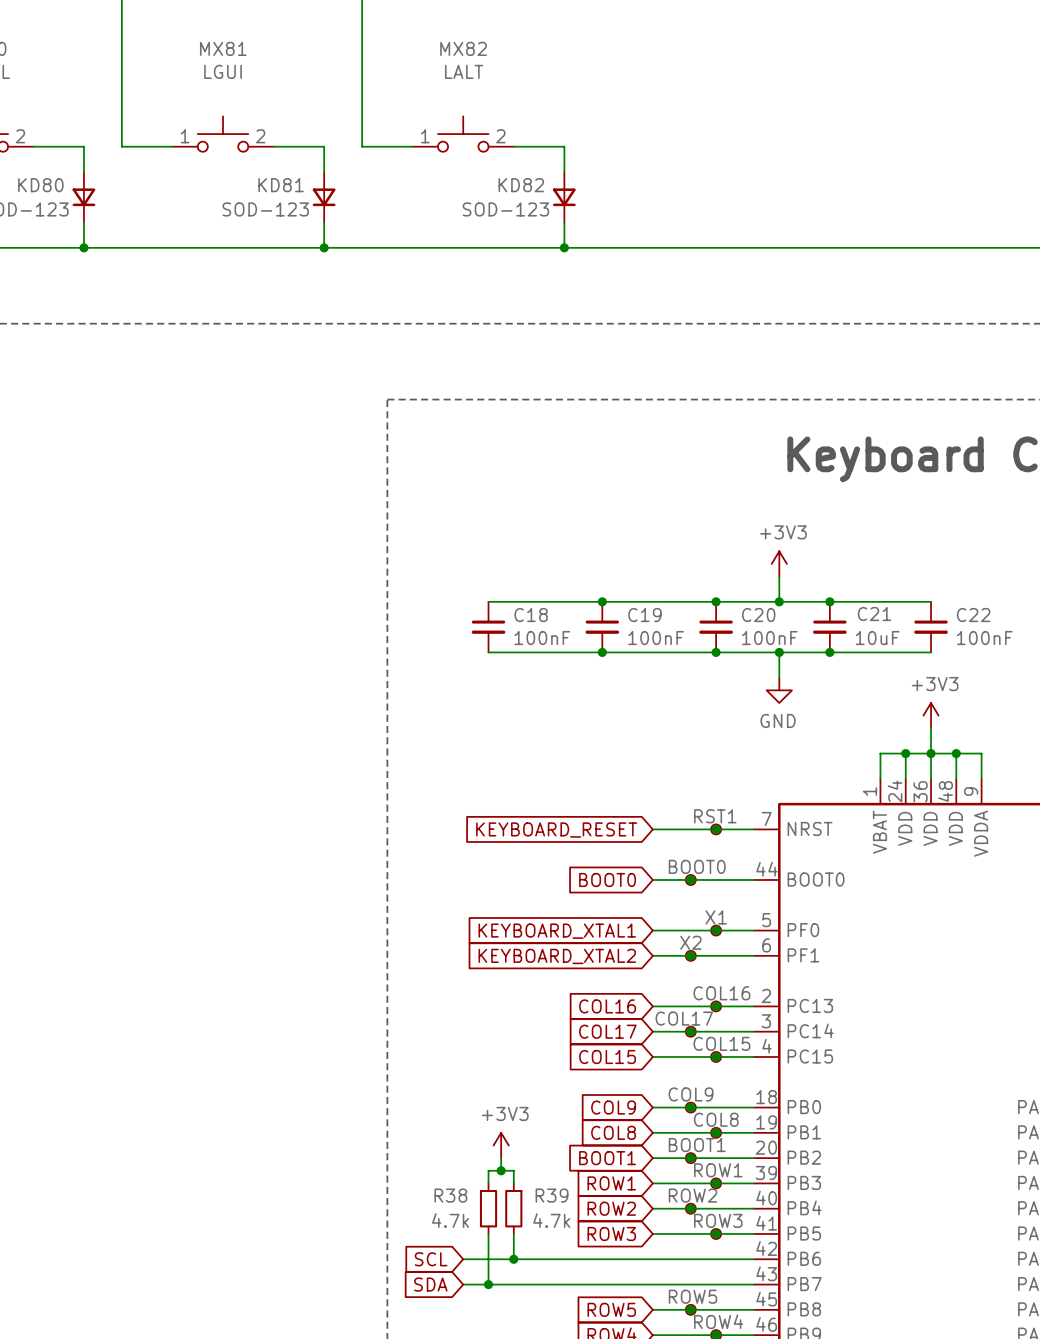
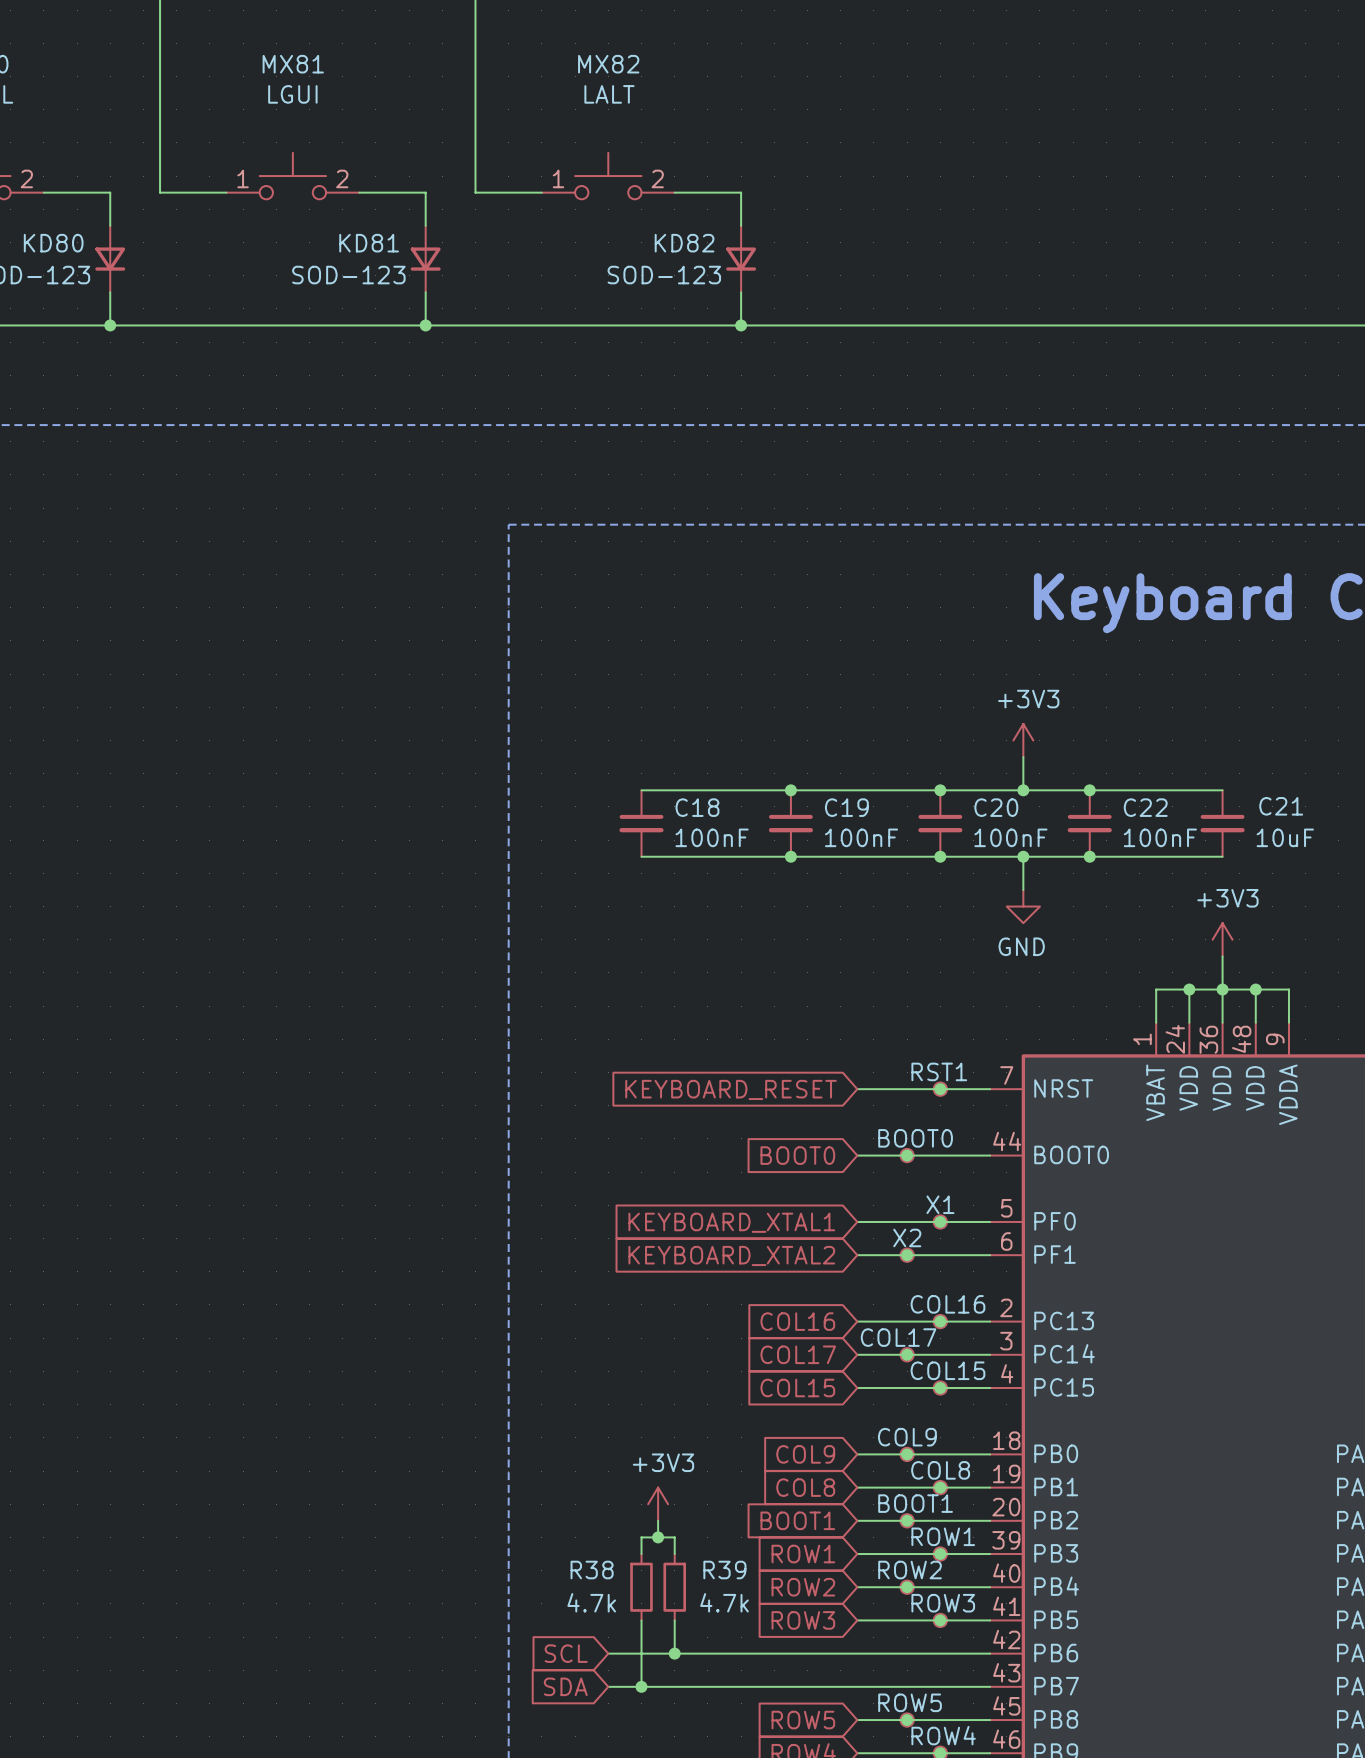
C21 name: C21 (874, 614) -> C22 (1145, 807)
C22 name: C22 (973, 615) -> C21 (1281, 806)
C21 value: 10uF (877, 638) -> 100nF (1160, 837)
C22 value: 100nF (984, 638) -> 10uF (1285, 837)

